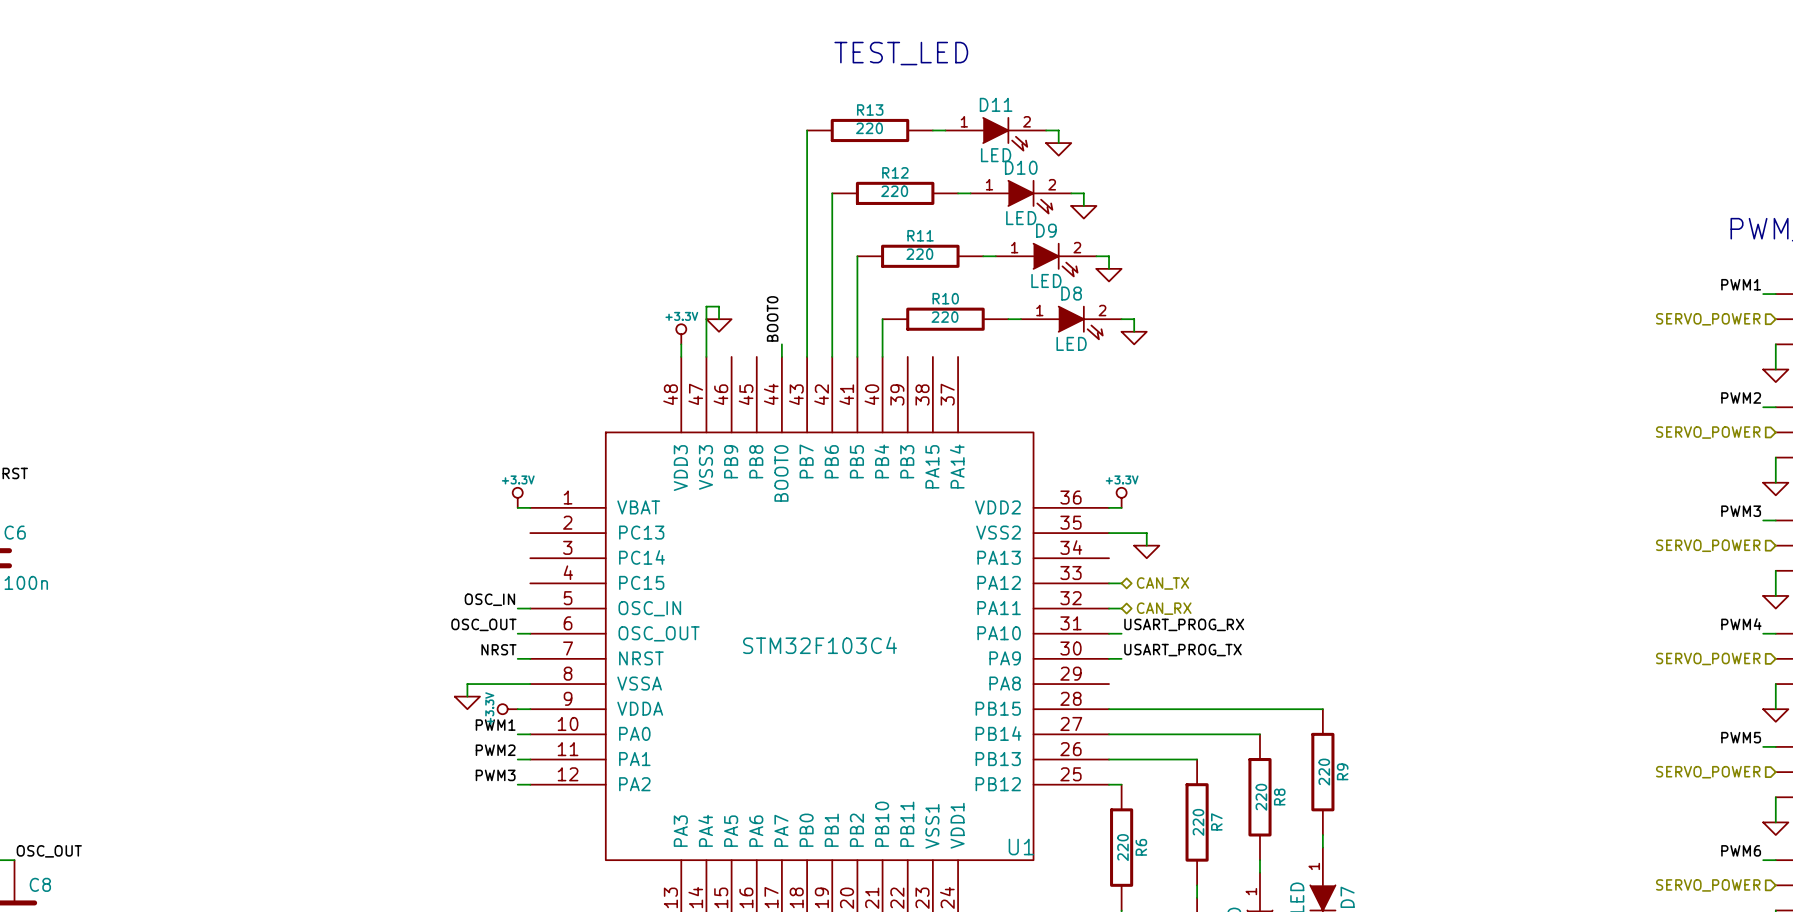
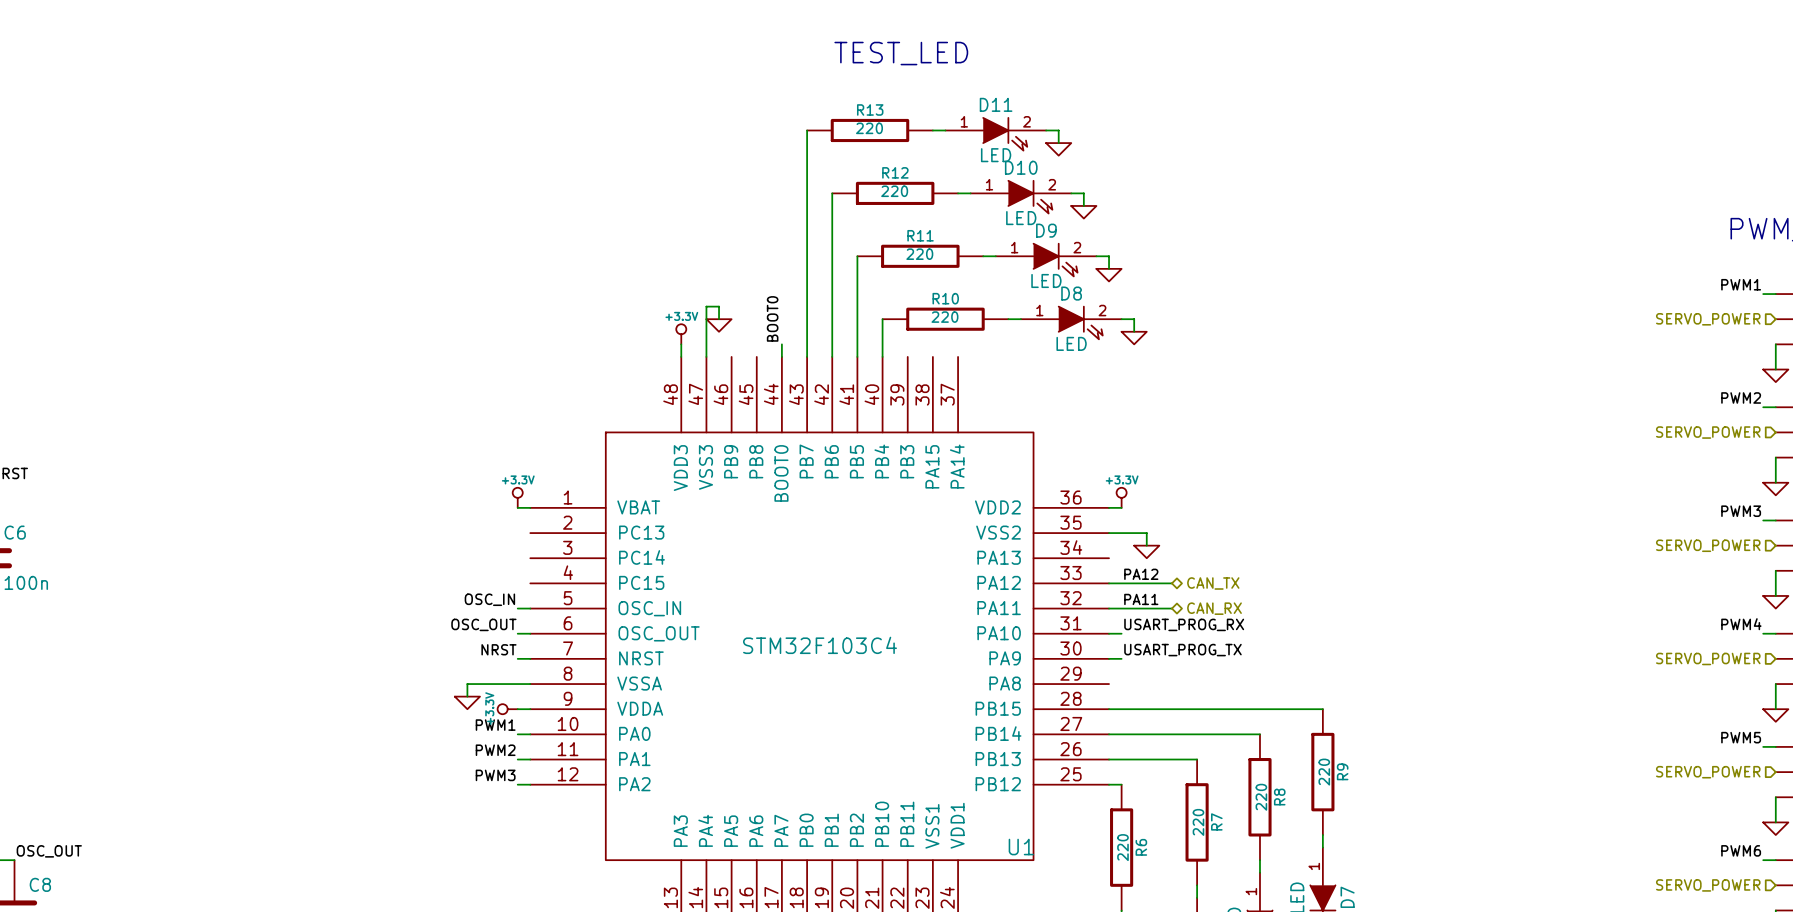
label: none -> PA12 (1141, 574)
wire: none -> (1121, 583) (1171, 583)
hierarchical label position: CAN_TX (1162, 583) -> CAN_TX (1213, 583)
label: none -> PA11 (1141, 599)
wire: none -> (1121, 608) (1171, 608)
hierarchical label position: CAN_RX (1164, 608) -> CAN_RX (1214, 608)

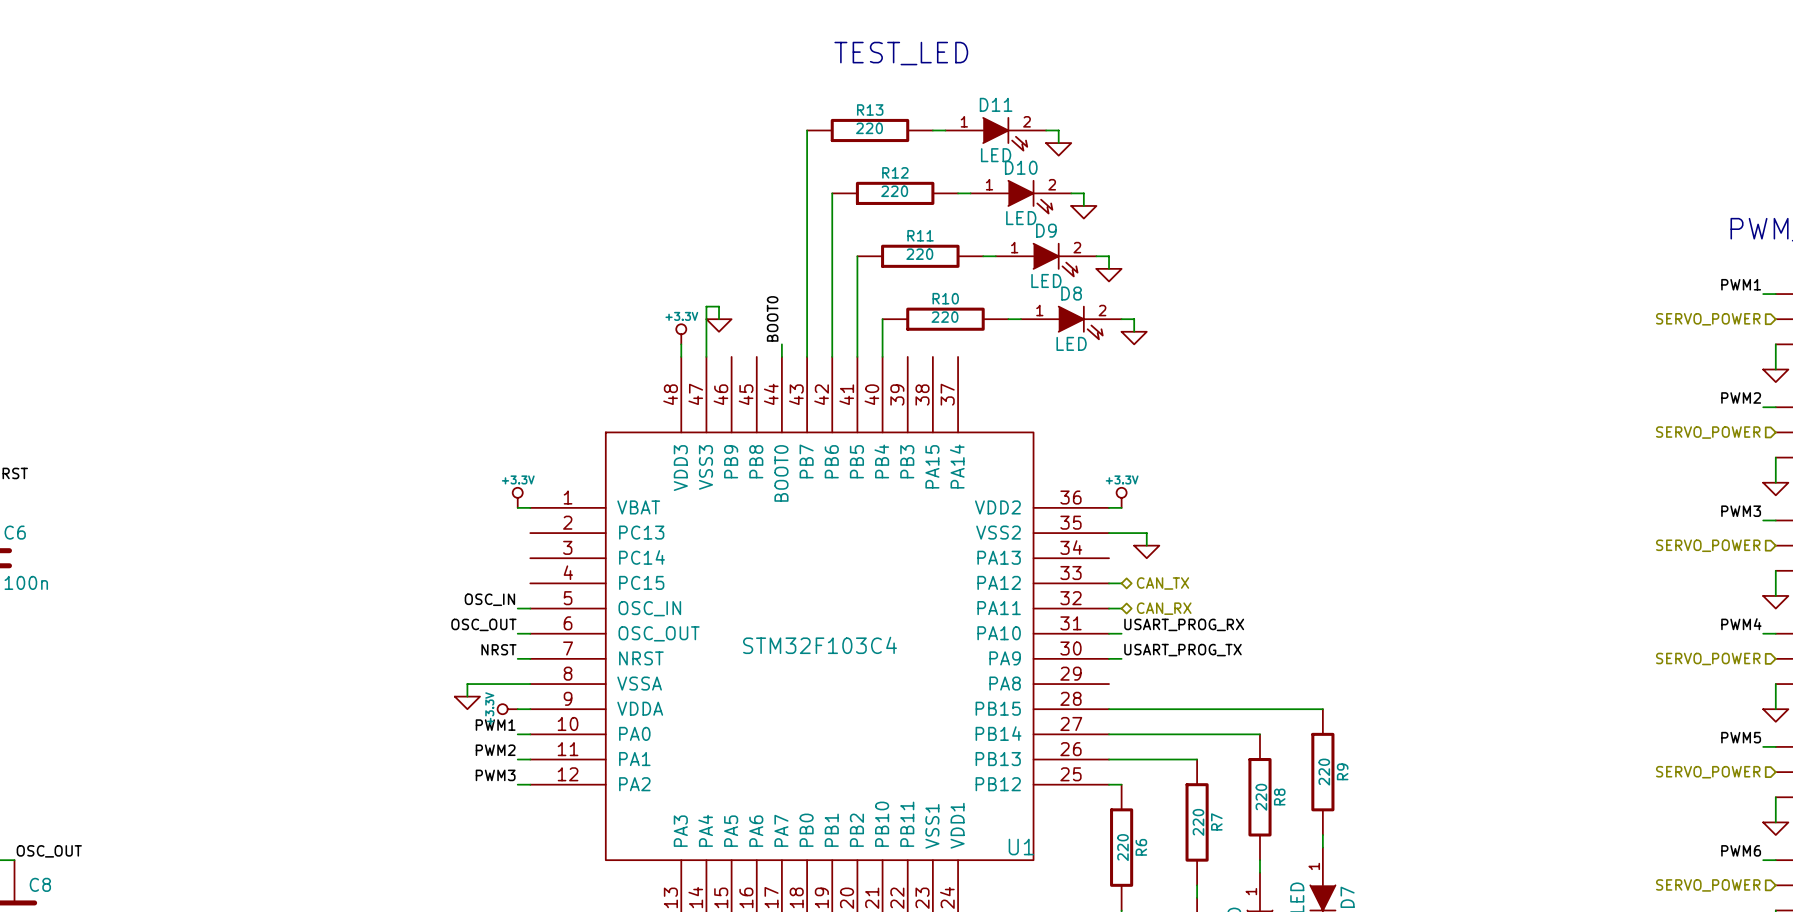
label: PA12 (1141, 574) -> none
wire: (1121, 583) (1171, 583) -> none
hierarchical label position: CAN_TX (1213, 583) -> CAN_TX (1162, 583)
label: PA11 (1141, 599) -> none
wire: (1121, 608) (1171, 608) -> none
hierarchical label position: CAN_RX (1214, 608) -> CAN_RX (1164, 608)

